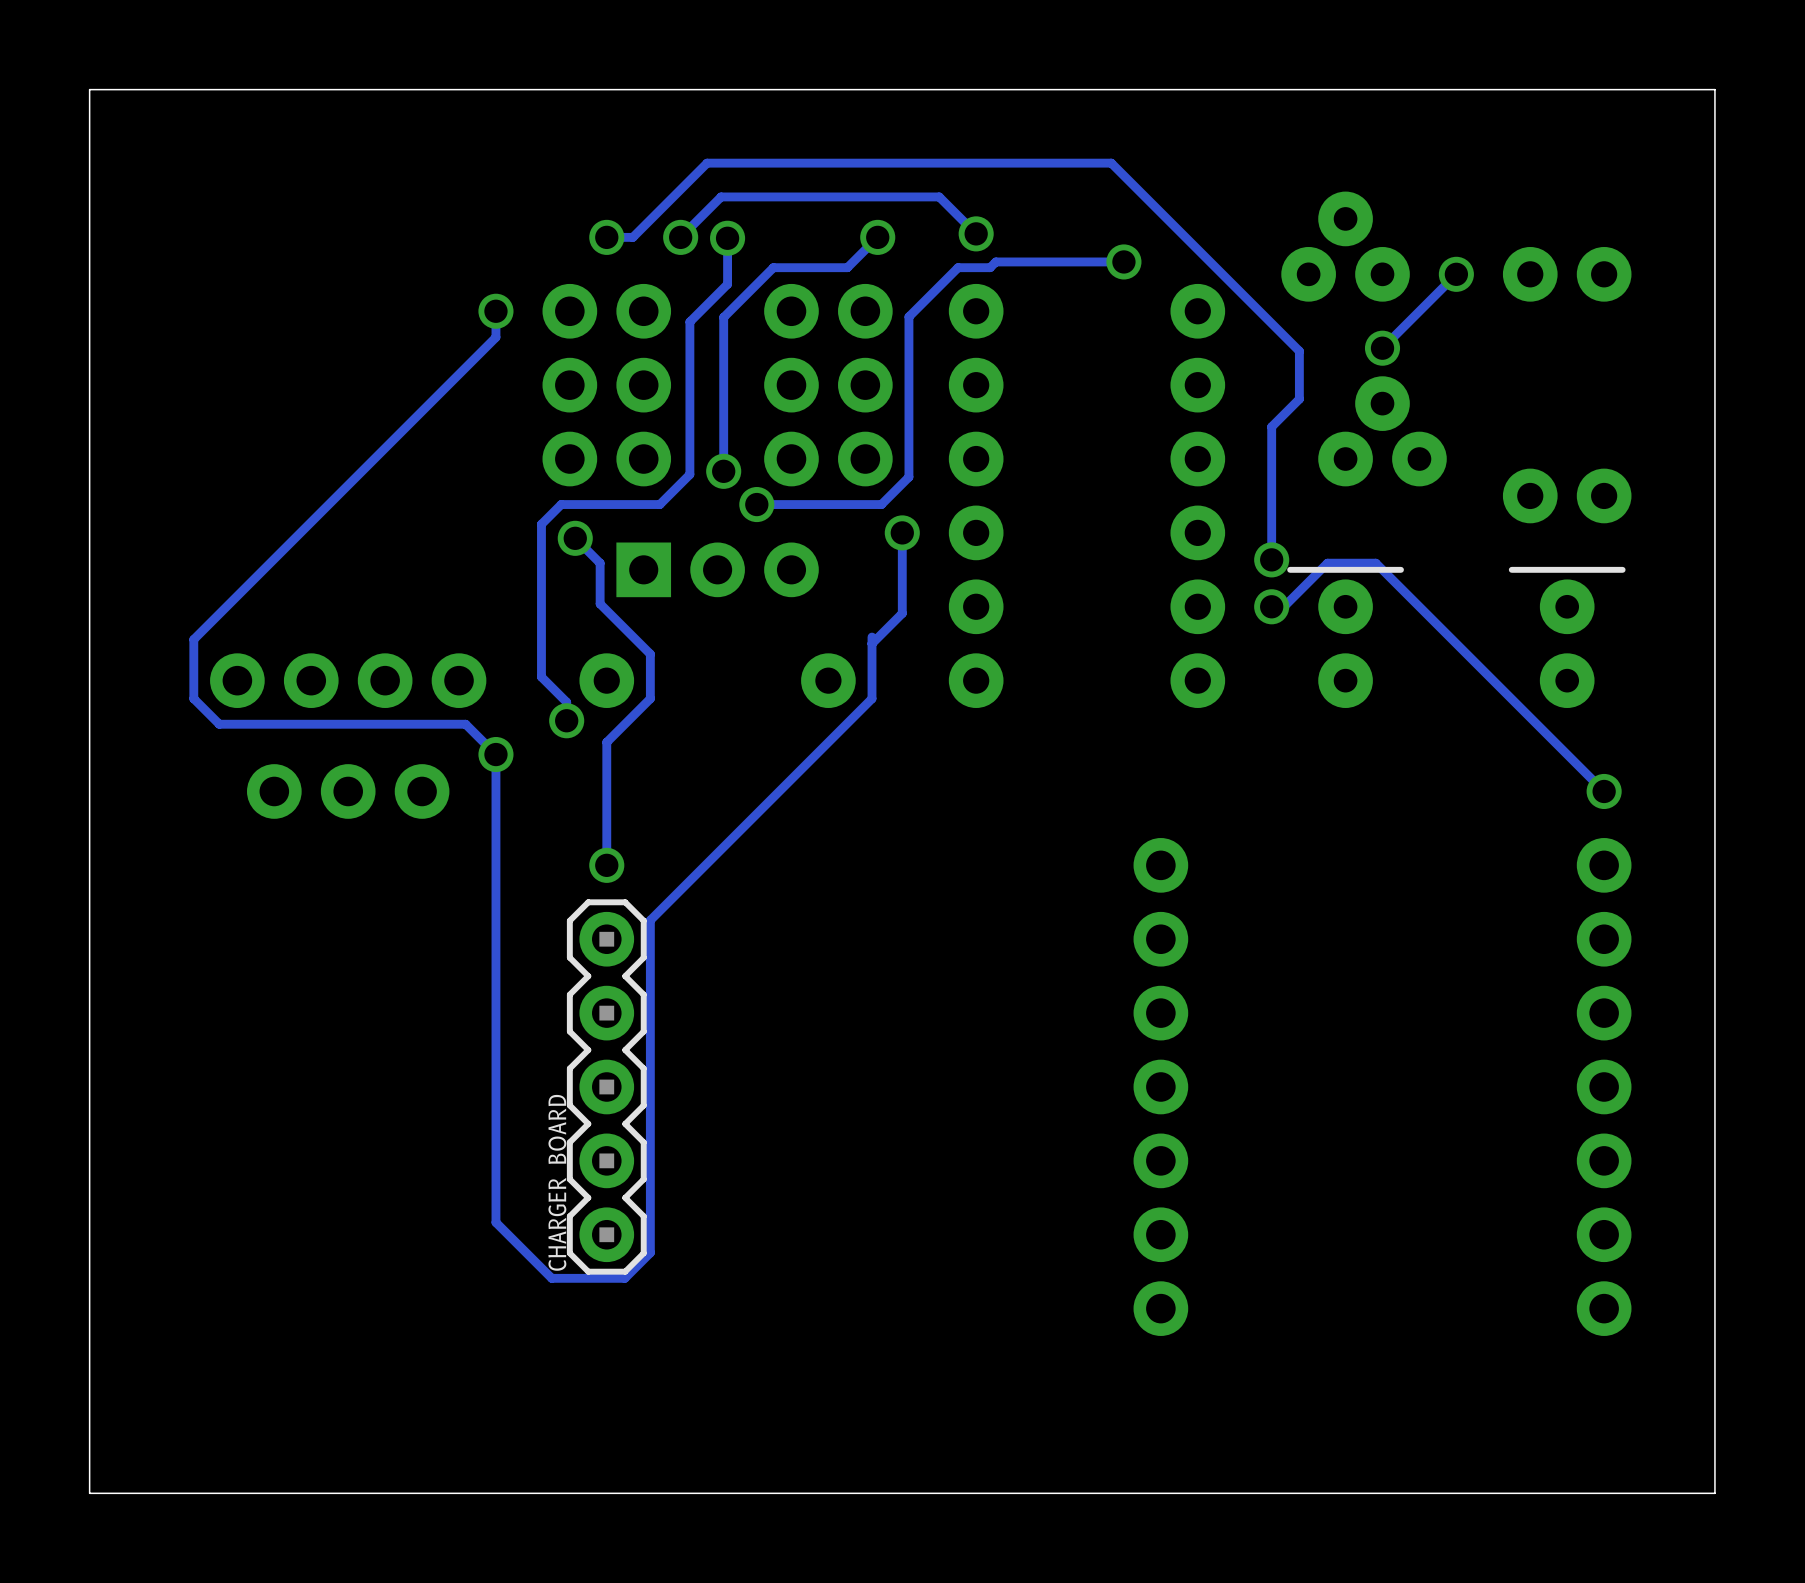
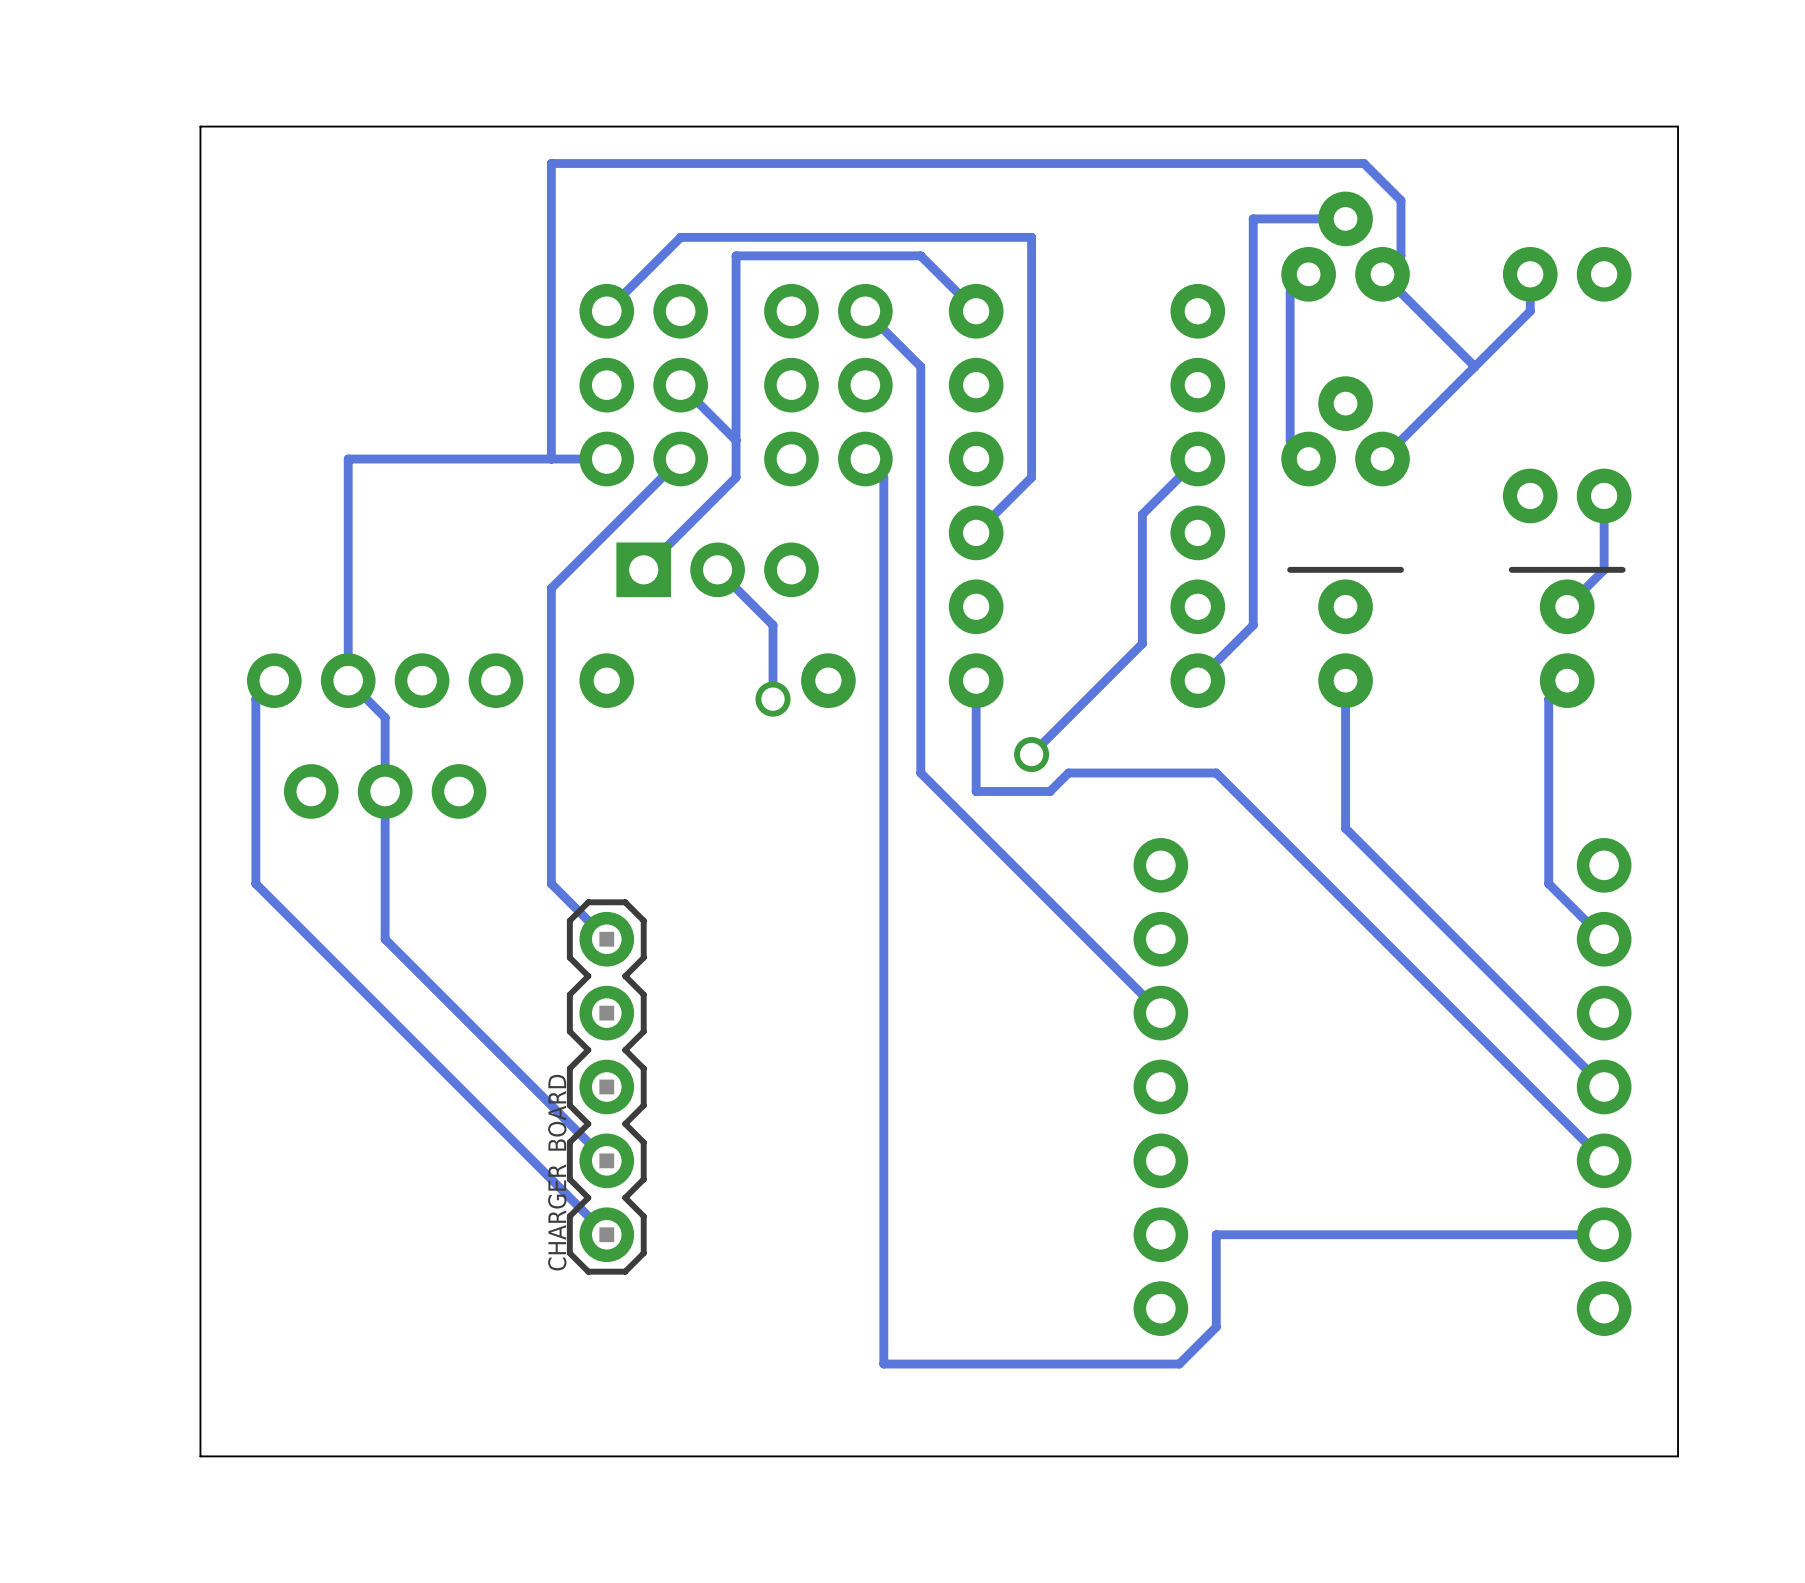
board edge: (1714, 89) (89, 89) (89, 1493) (1714, 1493) (1714, 89) -> (1678, 126) (1678, 1456) (200, 1456) (200, 126) (1678, 126)
track: none -> (1345, 218) (1253, 218) (1253, 625) (1197, 680)
track: (976, 233) (939, 196) (721, 196) (680, 237) -> none
via: (976, 233) -> none
track: (606, 237) (632, 237) (707, 163) (1111, 163) (1299, 351) (1299, 399) (1271, 426) (1271, 559) -> none
via: (606, 237) -> none
via: (680, 237) -> none
track: (877, 237) (847, 267) (773, 267) (723, 317) (723, 471) -> none
via: (877, 237) -> none
track: (727, 238) (727, 284) (689, 321) (689, 474) (659, 504) (561, 504) (541, 524) (541, 676) (566, 702) (566, 720) -> none
via: (727, 238) -> none
track: (1123, 261) (995, 261) (990, 267) (958, 267) (908, 316) (908, 477) (881, 504) (756, 504) -> none
via: (1123, 261) -> none
track: none -> (1308, 274) (1290, 292) (1290, 440) (1308, 459)
track: (1456, 274) (1382, 348) -> none
via: (1456, 274) -> none
track: none -> (1530, 274) (1530, 311) (1382, 459)
track: (495, 311) (495, 337) (193, 639) (193, 698) (219, 724) (465, 724) (495, 754) (495, 1222) (551, 1278) (624, 1278) (650, 1252) (650, 920) (872, 698) (872, 637) -> none
via: (495, 311) -> none
part: (569, 311) -> none
track: none -> (606, 311) (680, 237) (1031, 237) (1031, 477) (976, 532)
part: none -> (606, 311)
part: (643, 311) -> none
part: none -> (680, 311)
track: none -> (865, 311) (920, 366) (920, 773) (1160, 1013)
track: none -> (976, 311) (920, 255) (736, 255) (736, 477) (643, 569)
via: (1382, 348) -> none
track: none -> (1474, 366) (1382, 274) (1400, 255) (1400, 200) (1364, 163) (551, 163) (551, 459)
part: (569, 385) -> none
part: none -> (606, 385)
part: (643, 385) -> none
track: none -> (680, 385) (736, 440)
part: none -> (680, 385)
part position: (1382, 431) -> (1345, 431)
track: none -> (606, 459) (348, 459) (348, 680) (385, 717) (385, 939) (606, 1160)
part position: (606, 459) -> (643, 459)
track: none -> (680, 459) (551, 588) (551, 883) (606, 939)
track: none -> (865, 459) (883, 477) (883, 1364) (1179, 1364) (1216, 1327) (1216, 1234) (1604, 1234)
track: none -> (1197, 459) (1142, 514) (1142, 643) (1031, 754)
via: (723, 471) -> none
track: none -> (1604, 495) (1604, 569) (1567, 606)
via: (756, 504) -> none
track: (902, 532) (902, 613) (872, 643) -> none
via: (902, 532) -> none
track: (575, 538) (600, 563) (600, 603) (650, 654) (650, 698) (606, 742) (606, 865) -> none
via: (575, 538) -> none
via: (1271, 559) -> none
track: none -> (717, 569) (773, 625) (773, 699)
track: (1271, 606) (1283, 606) (1327, 563) (1375, 563) (1604, 791) -> none
via: (1271, 606) -> none
track: none -> (274, 680) (255, 699) (255, 883) (606, 1234)
part position: (348, 680) -> (385, 680)
track: none -> (976, 680) (976, 791) (1050, 791) (1068, 773) (1216, 773) (1604, 1160)
track: none -> (1345, 680) (1345, 828) (1604, 1086)
track: none -> (1567, 680) (1548, 699) (1548, 883) (1604, 939)
via: none -> (773, 699)
via: (566, 720) -> none
via: (495, 754) -> none
via: none -> (1031, 754)
part position: (348, 791) -> (385, 791)
via: (1604, 791) -> none
via: (606, 865) -> none

